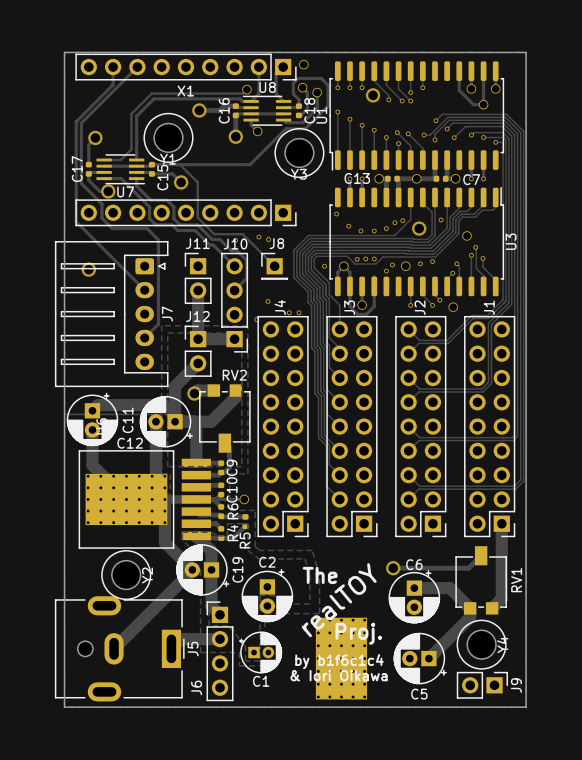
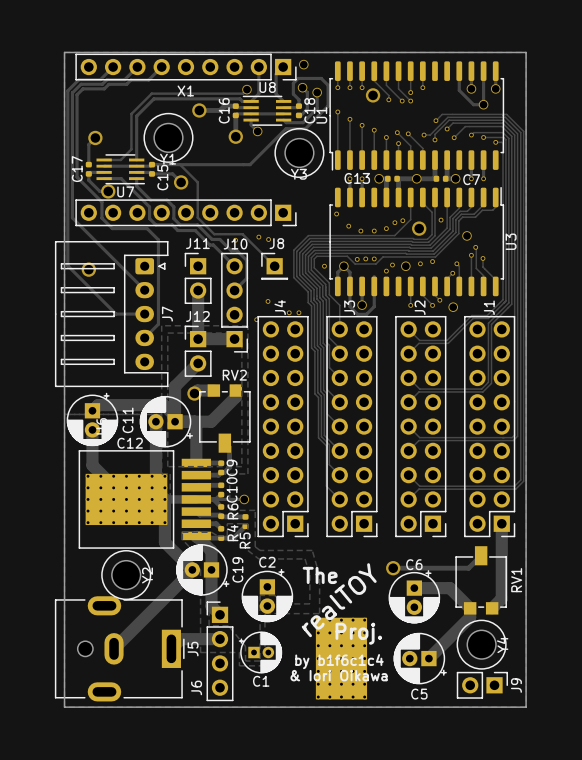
track: (113, 67) (113, 84) (76, 121) (76, 221) -> (72, 92) (72, 217) (76, 221)
track: none -> (113, 67) (100, 79) (79, 79) (67, 90) (67, 265) (116, 314) (144, 314)
track: (124, 79) (81, 123) (81, 183) (101, 204) -> (161, 67) (148, 80) (130, 80) (126, 84) (108, 84) (104, 88) (83, 88) (77, 94) (77, 177) (101, 204)
track: none -> (124, 79) (107, 79) (102, 84) (81, 84) (72, 92)

